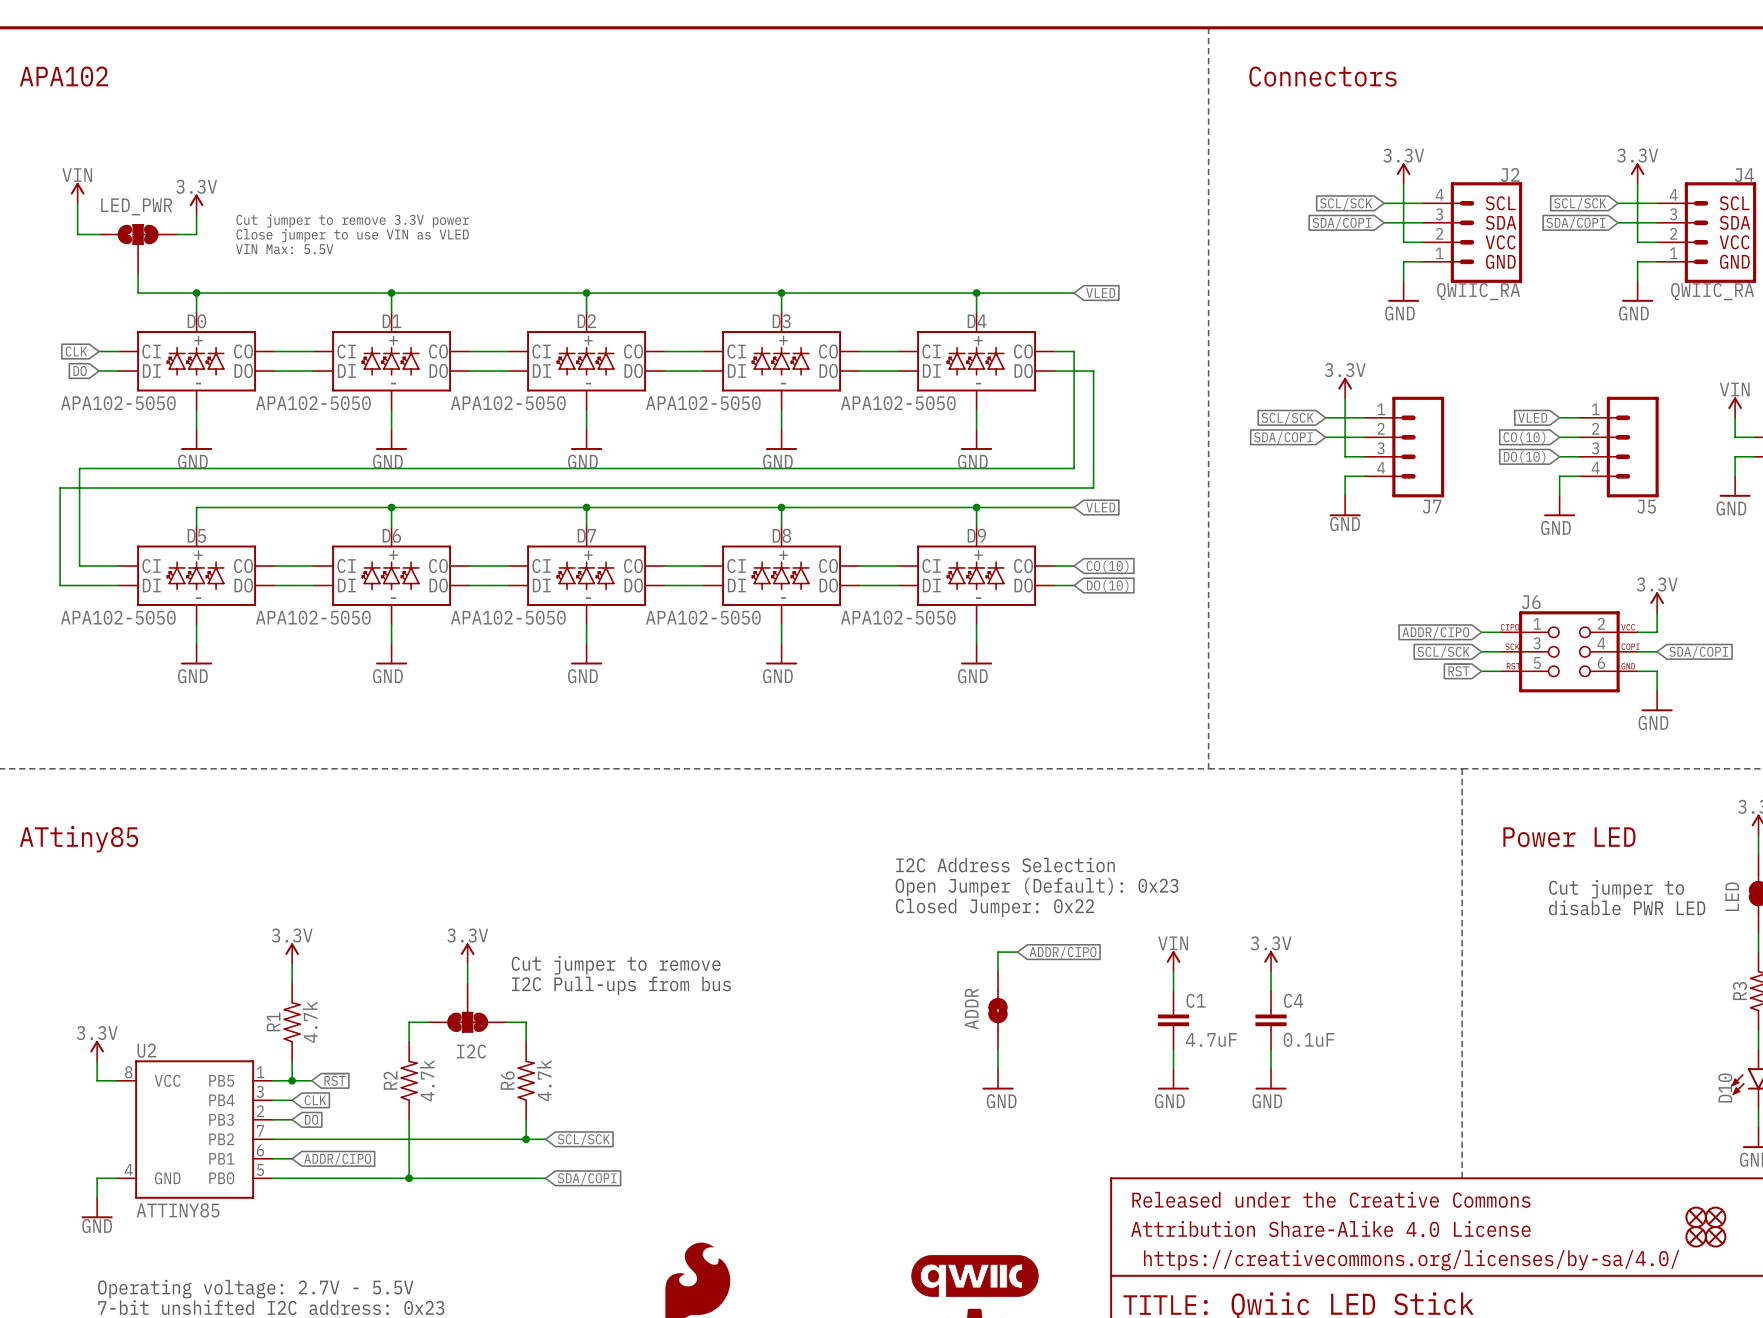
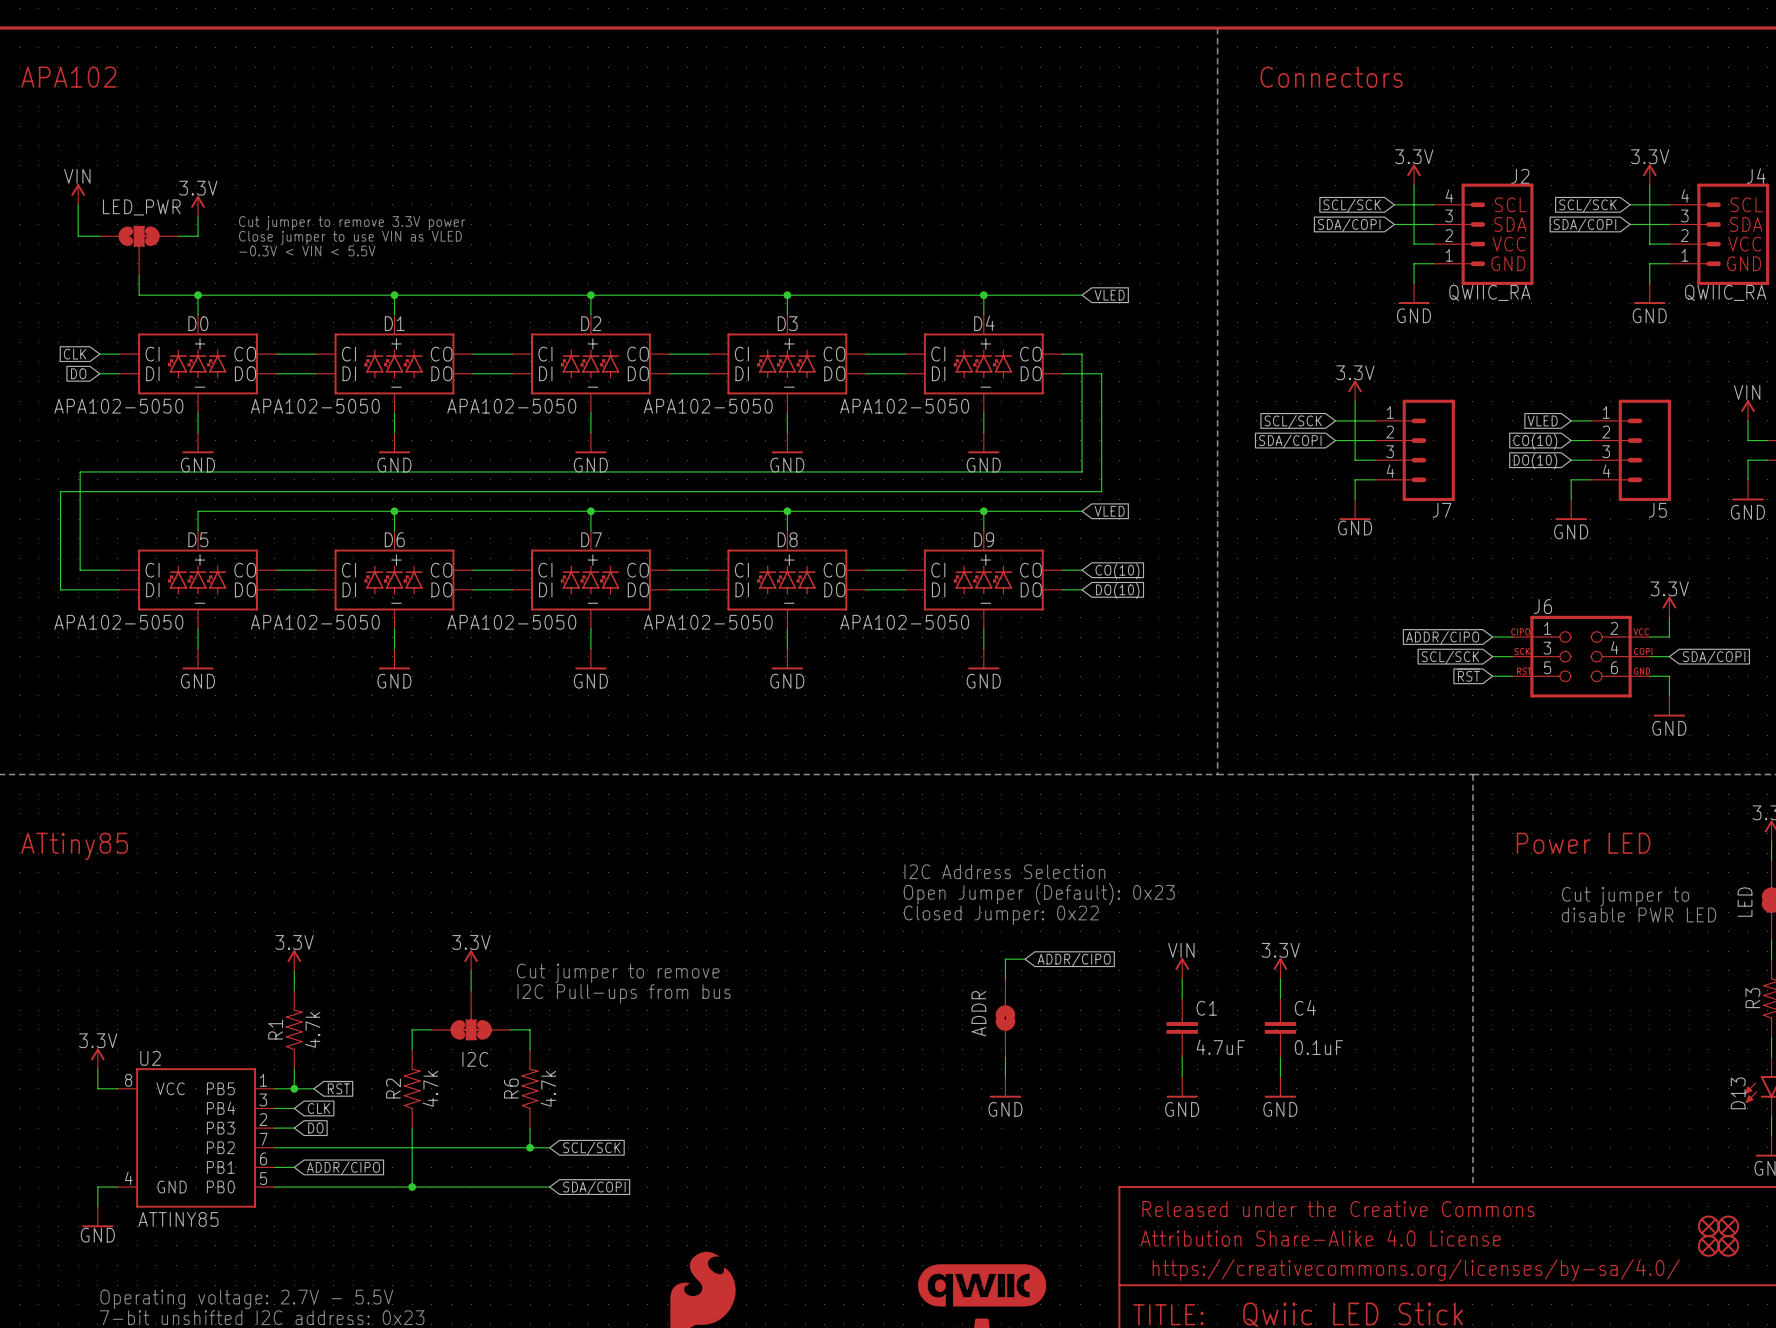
text: VIN Max: 5.5V (284, 249) -> -0.3V < VIN < 5.5V (307, 250)
D10 name: D10 (1725, 1088) -> D13 (1738, 1093)

